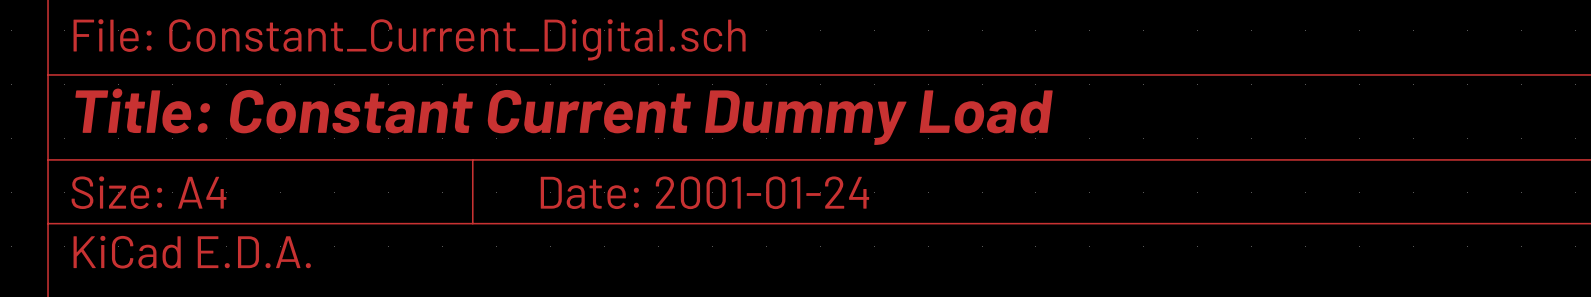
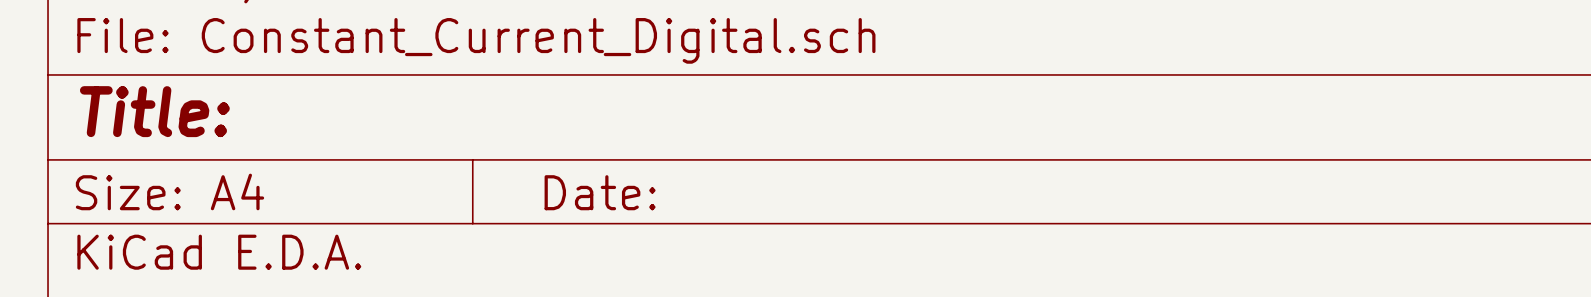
title block: Title: Constant Current Dummy Load (564, 116) -> Title: (154, 111)
title block: Date: 2001-01-24 (704, 192) -> Date: (600, 192)

